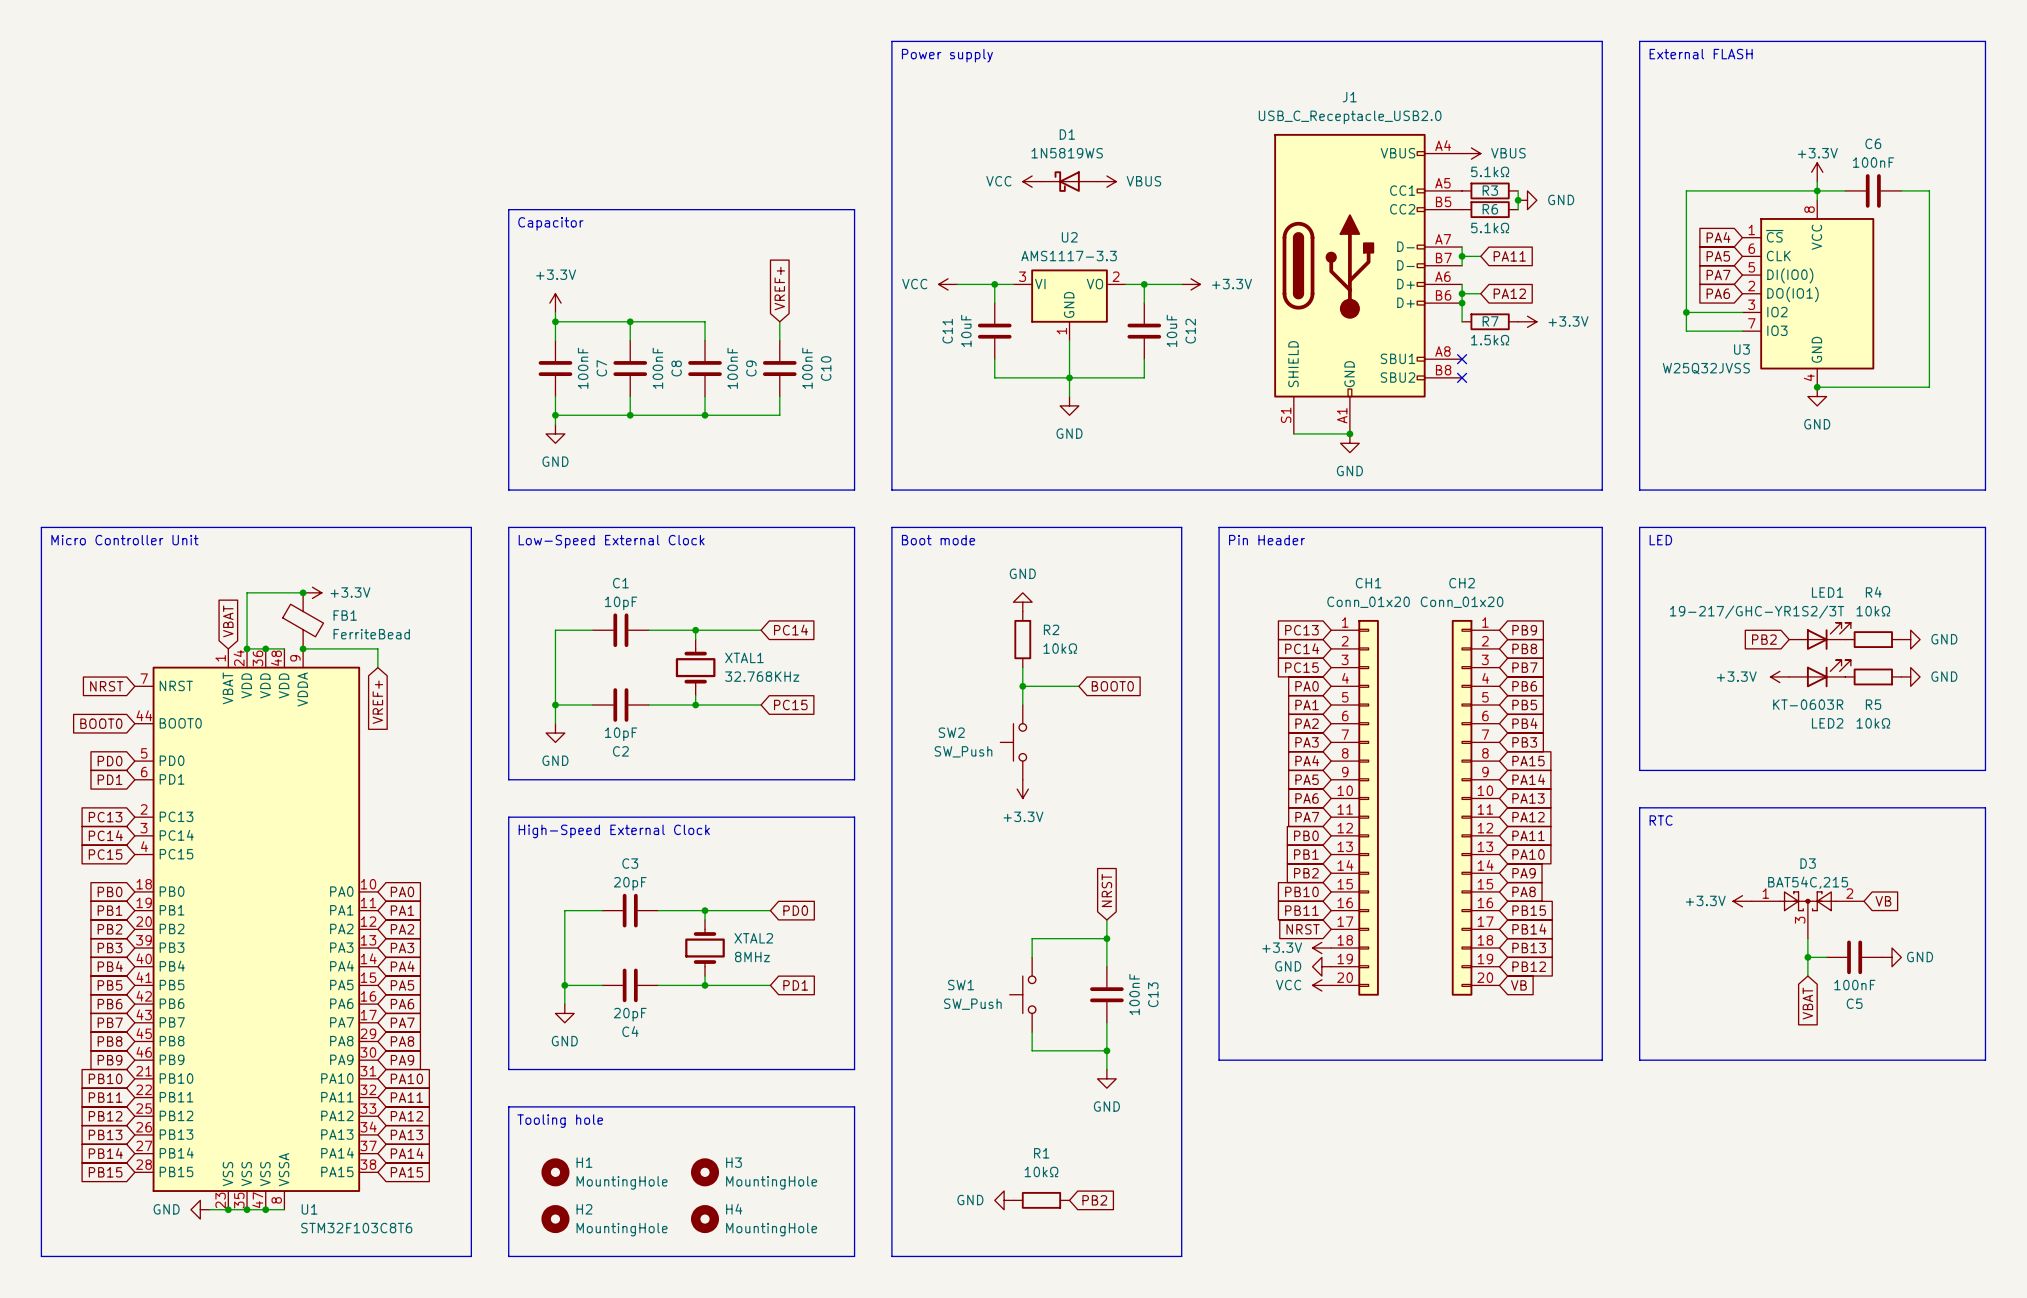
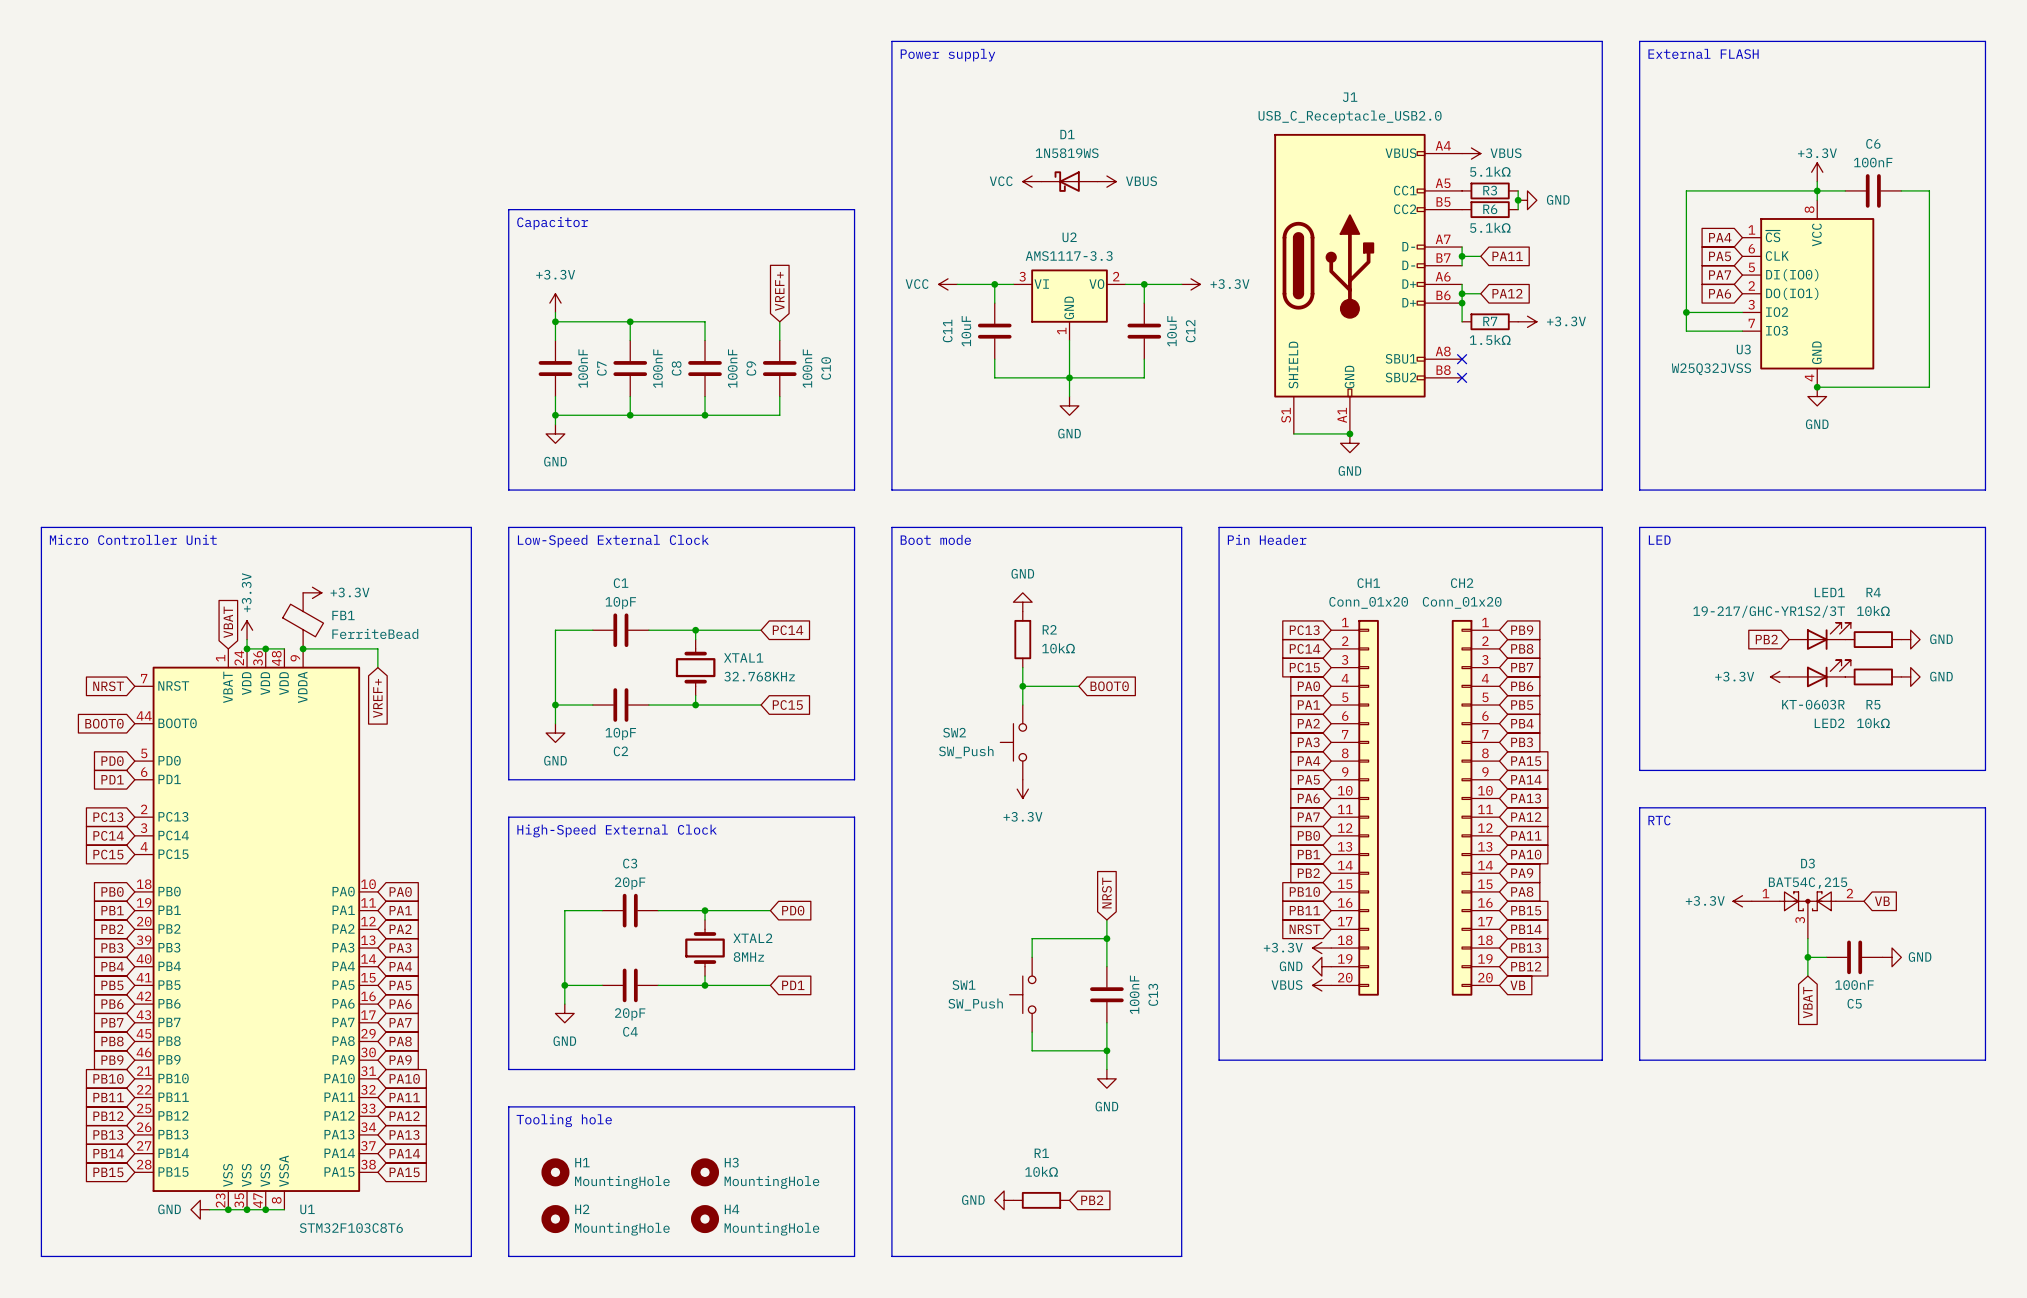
wire: (303, 592) (247, 592) (247, 639) -> none
junction: (303, 592) -> none
power symbol: none -> +3.3V (247, 630)
power symbol: VCC (1321, 985) -> VBUS (1321, 985)

